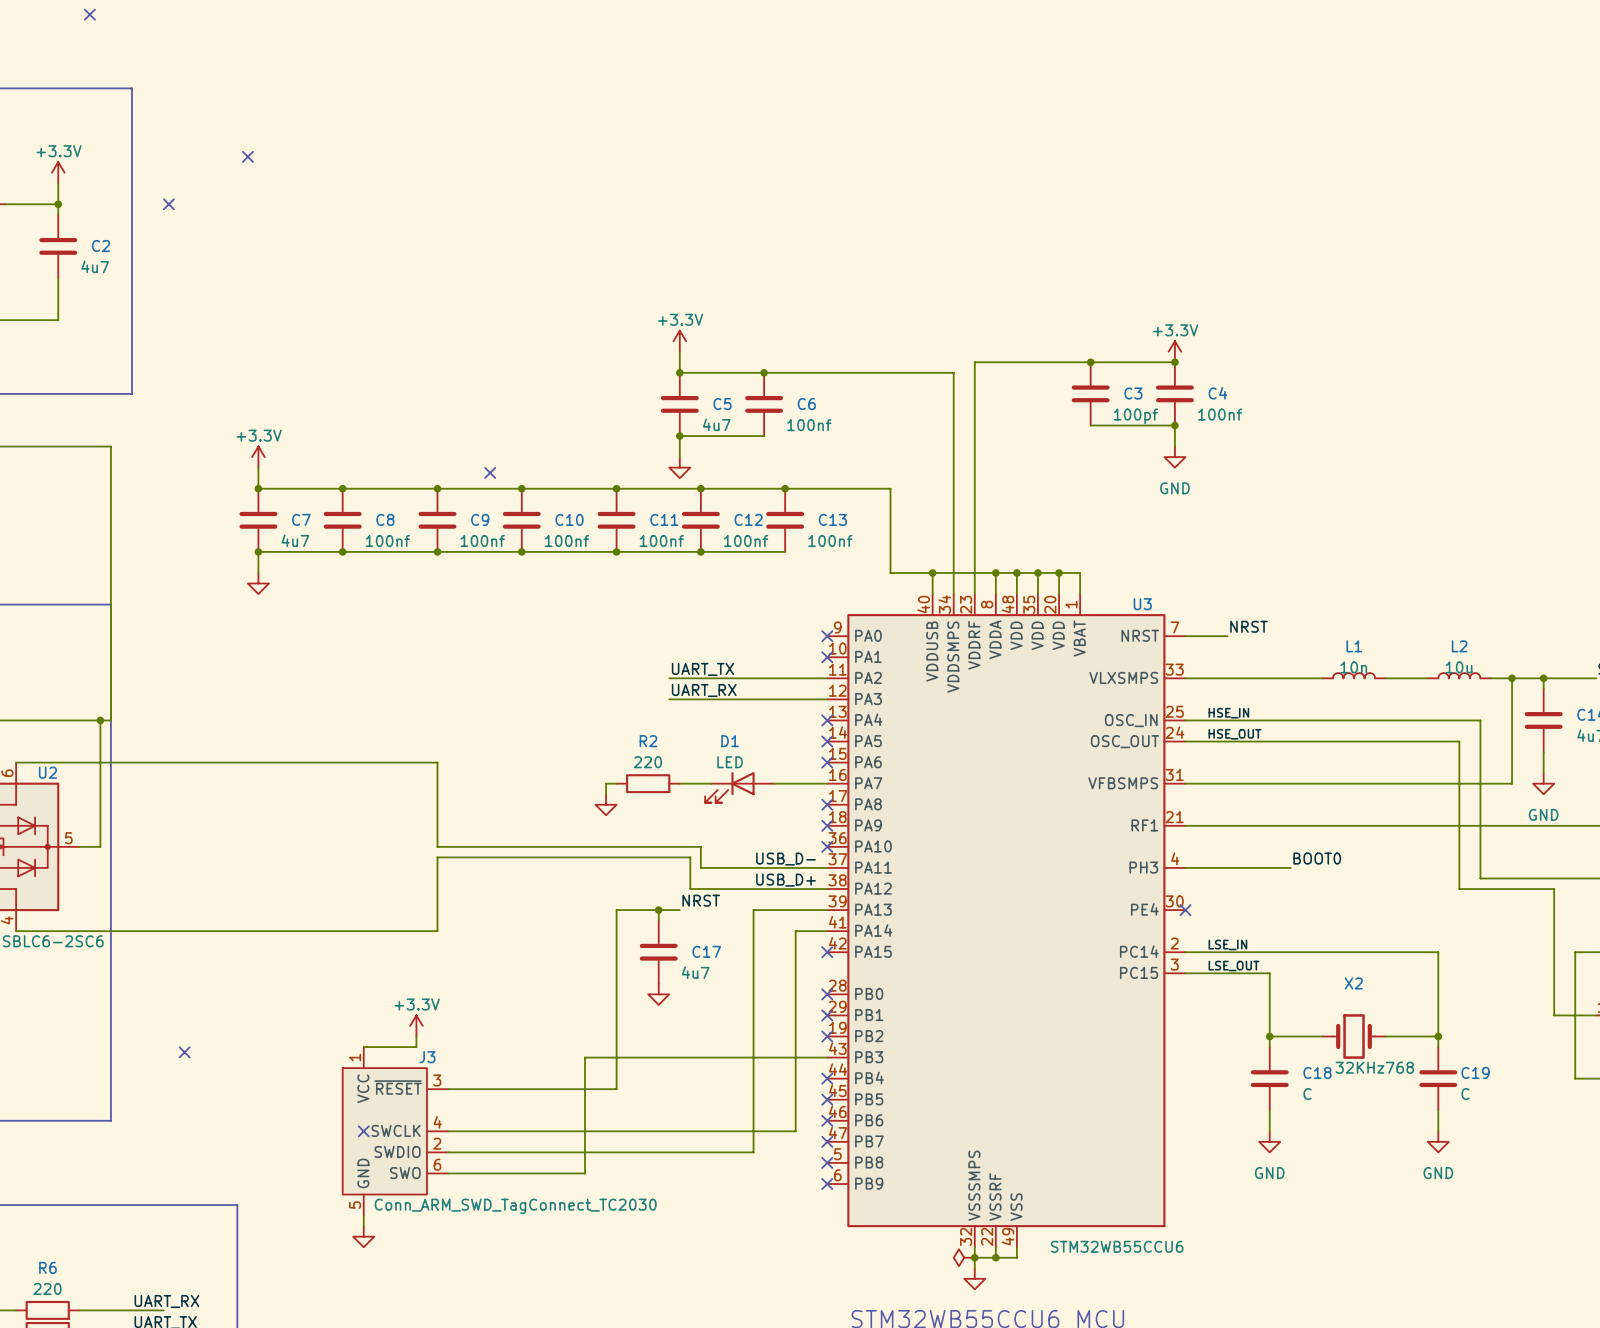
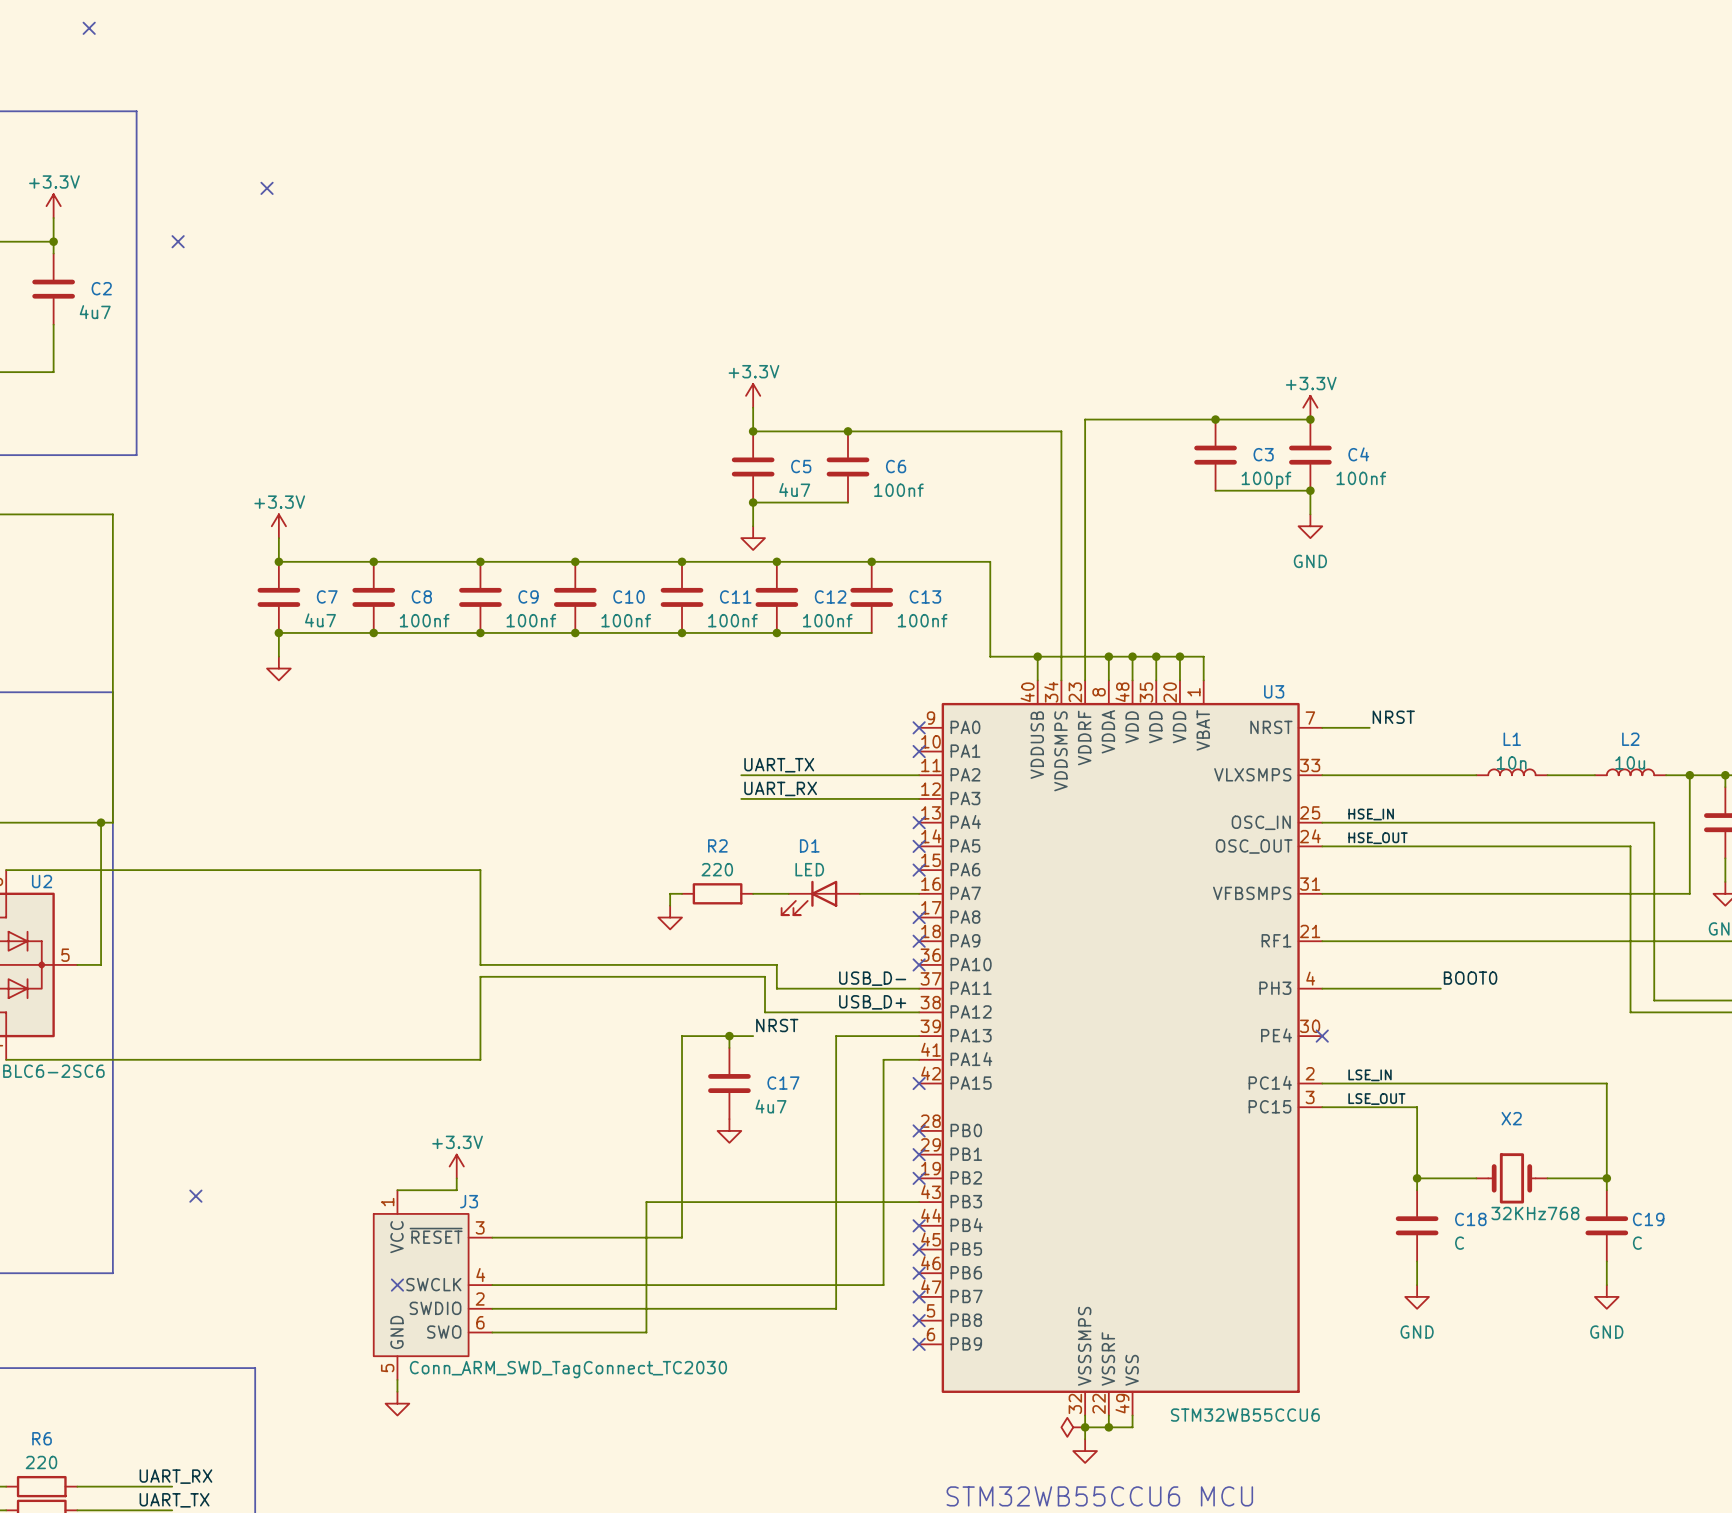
no-connect mark: (490, 472) -> none

